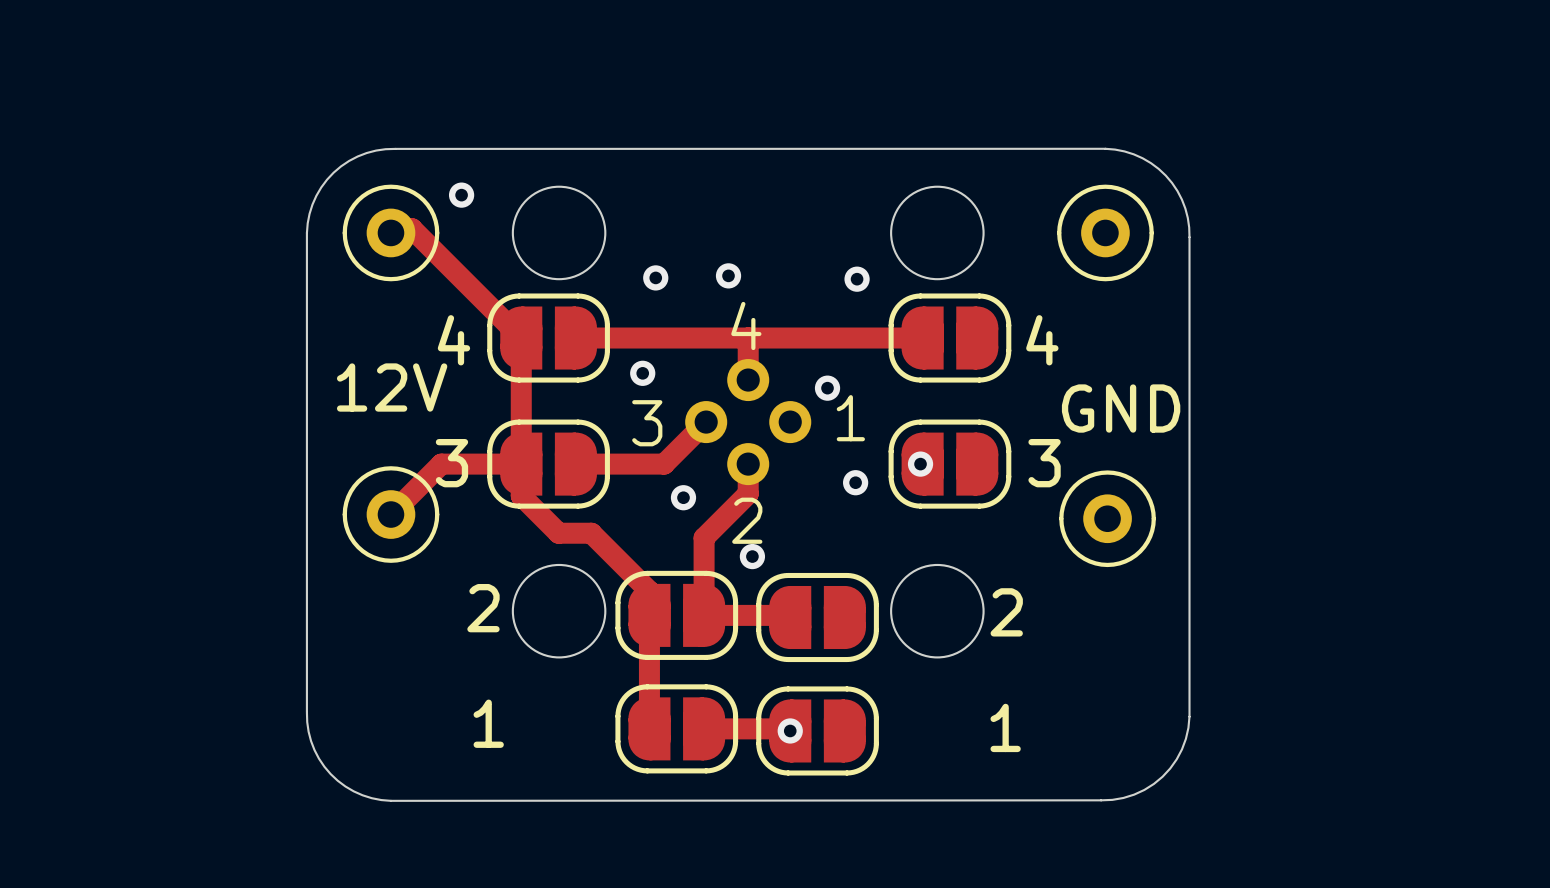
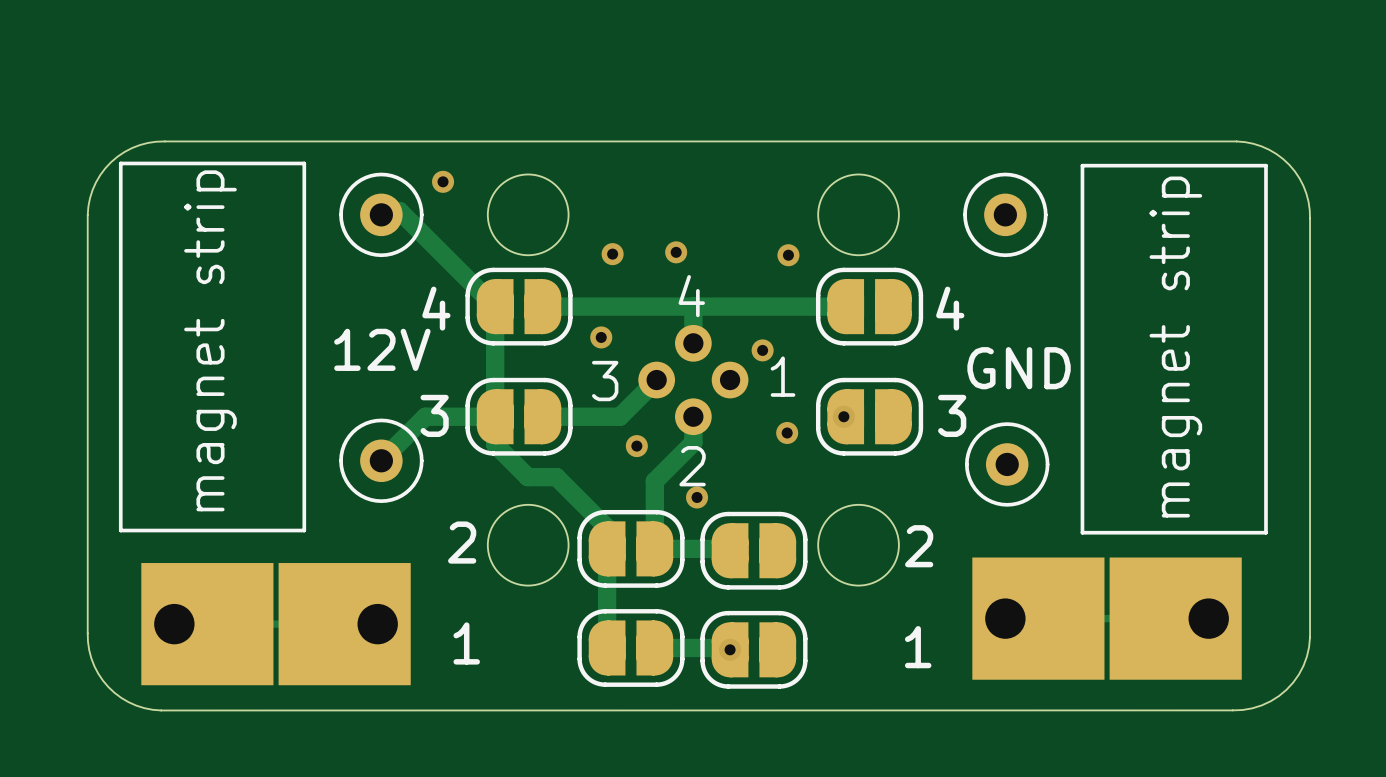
line: none -> (120, 163) (304, 163) (304, 530) (120, 530) (120, 163)
line: none -> (1082, 165) (1265, 165) (1265, 532) (1082, 532) (1082, 165)
text: none -> magnet strip (210, 340)
text: none -> magnet strip (1175, 347)
part: none -> (1107, 618)
part: none -> (276, 624)
board edge: (306, 712) (306, 232) (309, 213) (321, 187) (333, 172) (349, 160) (366, 153) (395, 148) (1105, 148) (1133, 154) (1150, 163) (1165, 175) (1177, 190) (1185, 208) (1189, 237) (1189, 716) (1185, 738) (1176, 759) (1162, 776) (1144, 789) (1123, 797) (1101, 800) (381, 800) (353, 791) (337, 780) (324, 766) (311, 741) (306, 712) -> (164, 141) (139, 145) (124, 151) (111, 162) (96, 182) (90, 198) (87, 214) (87, 641) (91, 658) (98, 673) (108, 687) (128, 702) (144, 708) (161, 710) (1232, 710) (1261, 705) (1278, 696) (1293, 682) (1303, 665) (1310, 637) (1309, 210) (1306, 193) (1294, 171) (1283, 159) (1269, 149) (1253, 143) (1236, 141) (164, 141)

